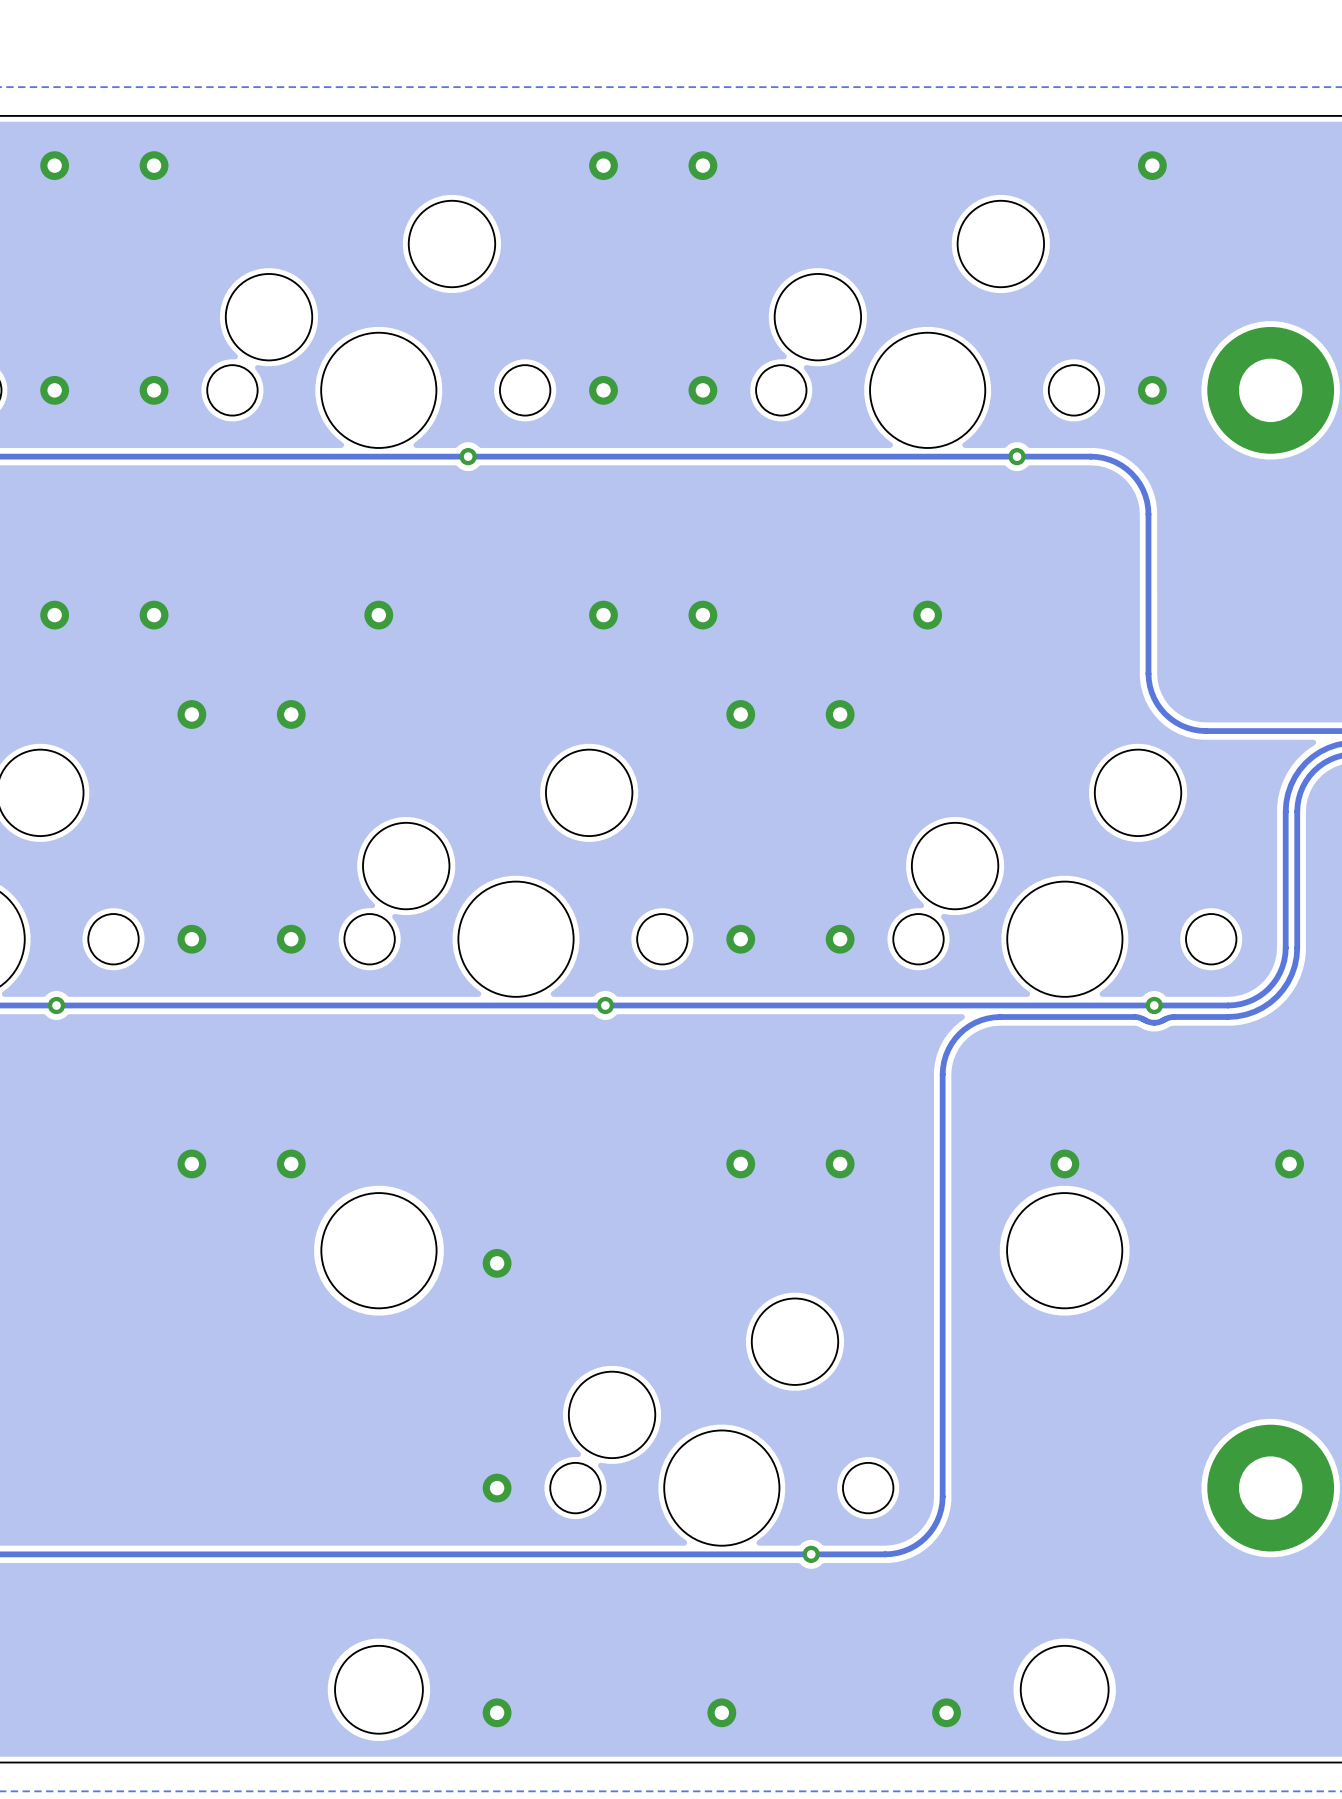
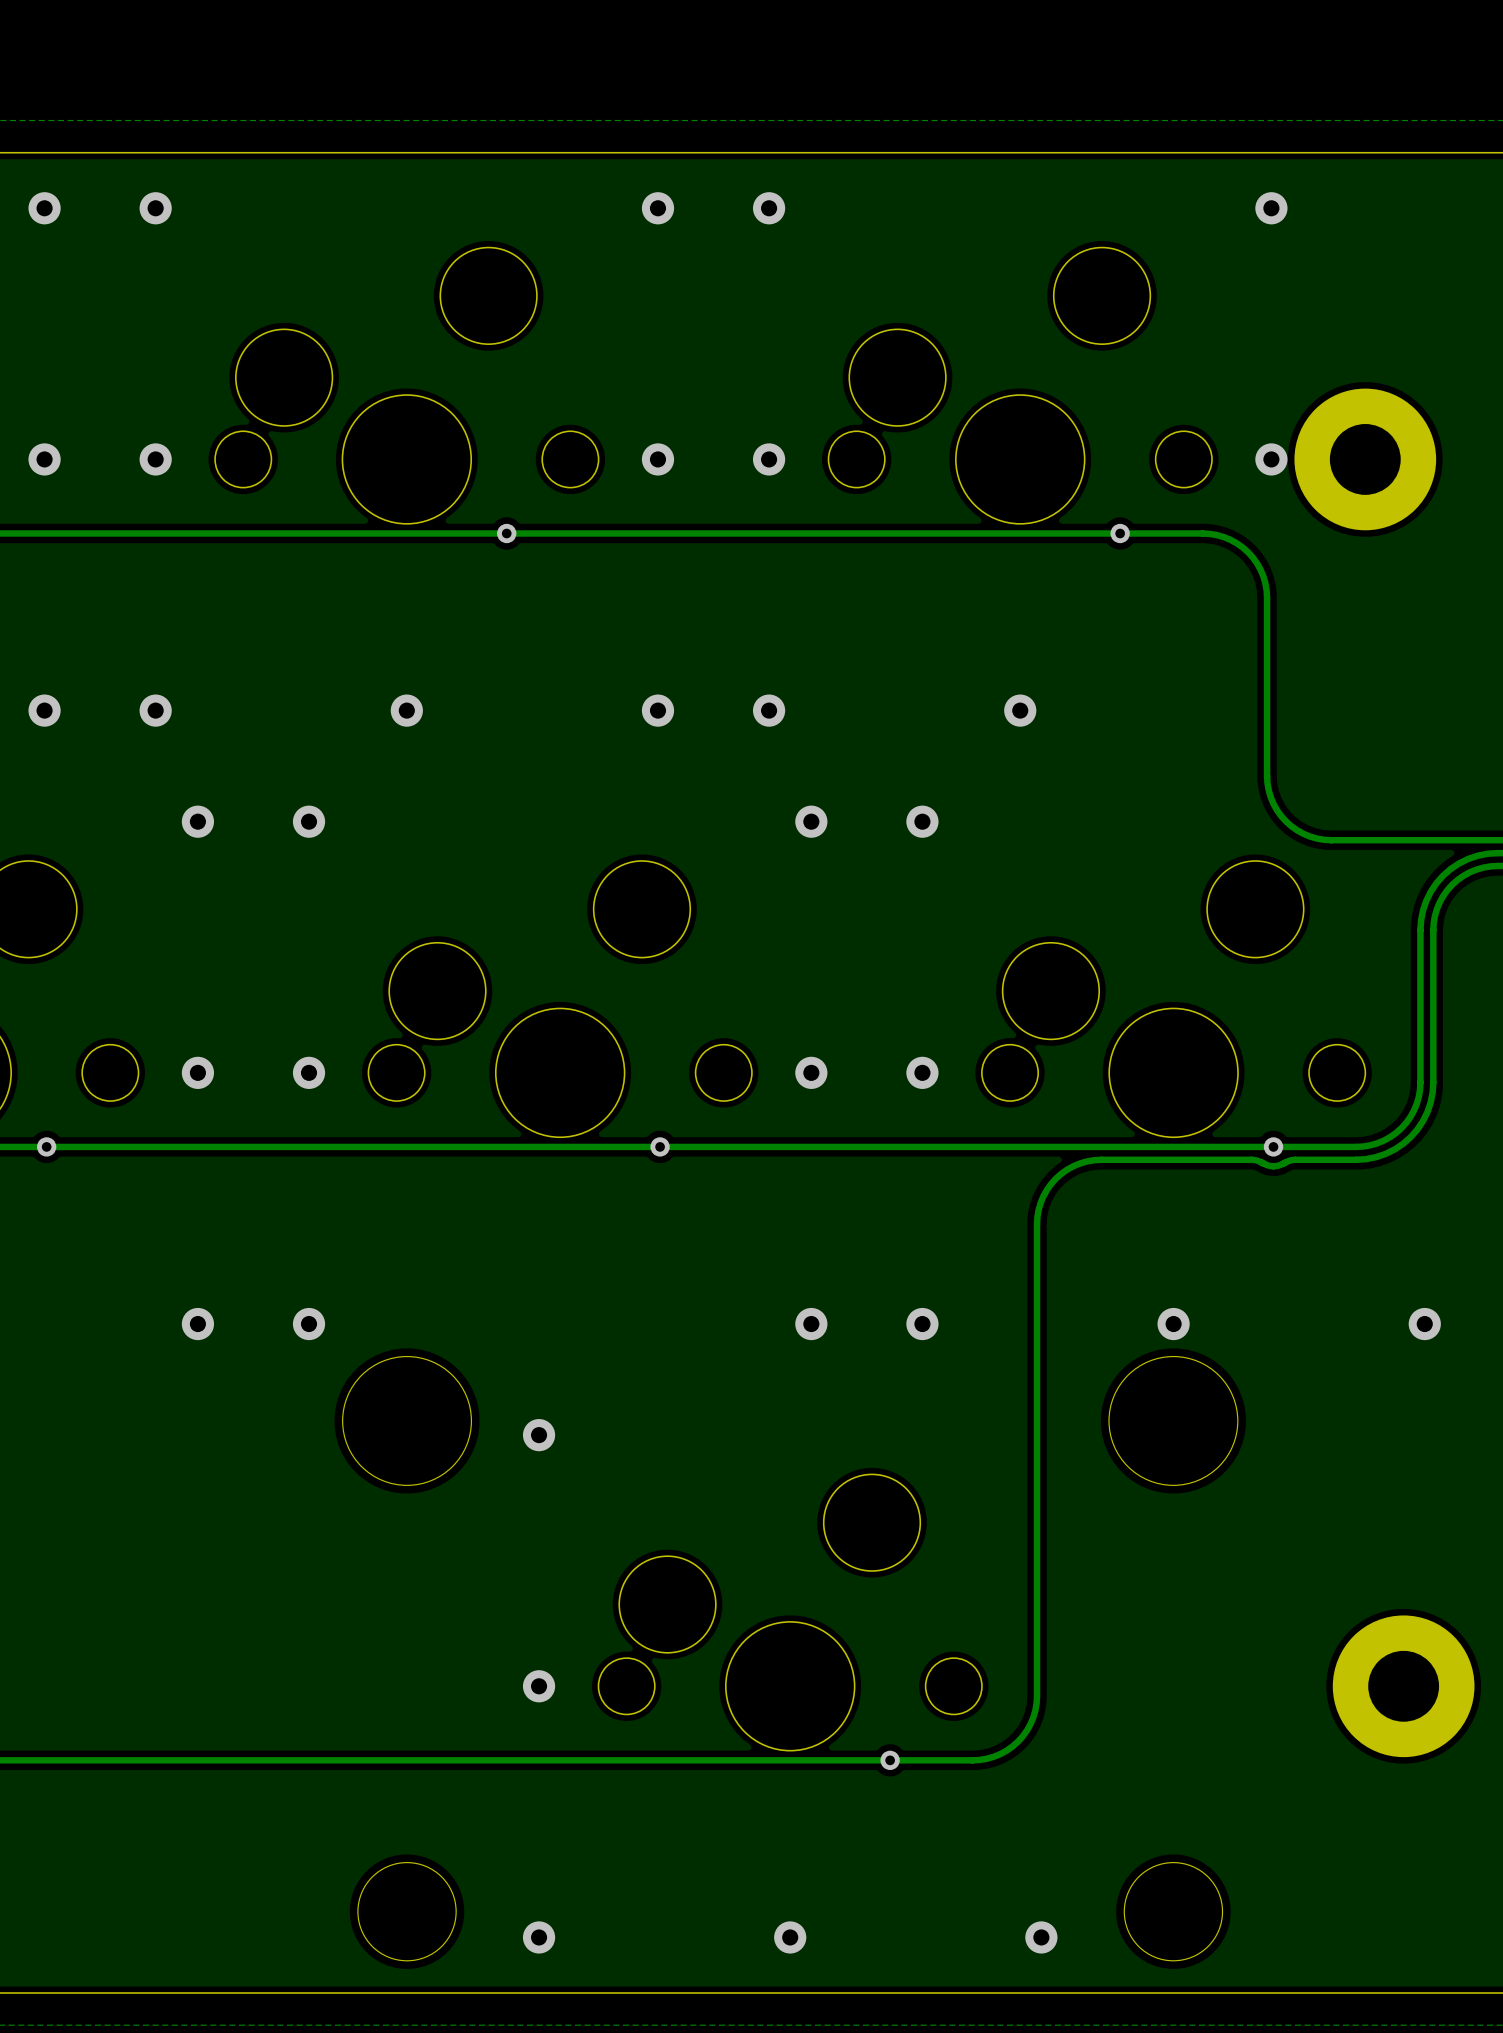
part position: (1270, 390) -> (1365, 459)

